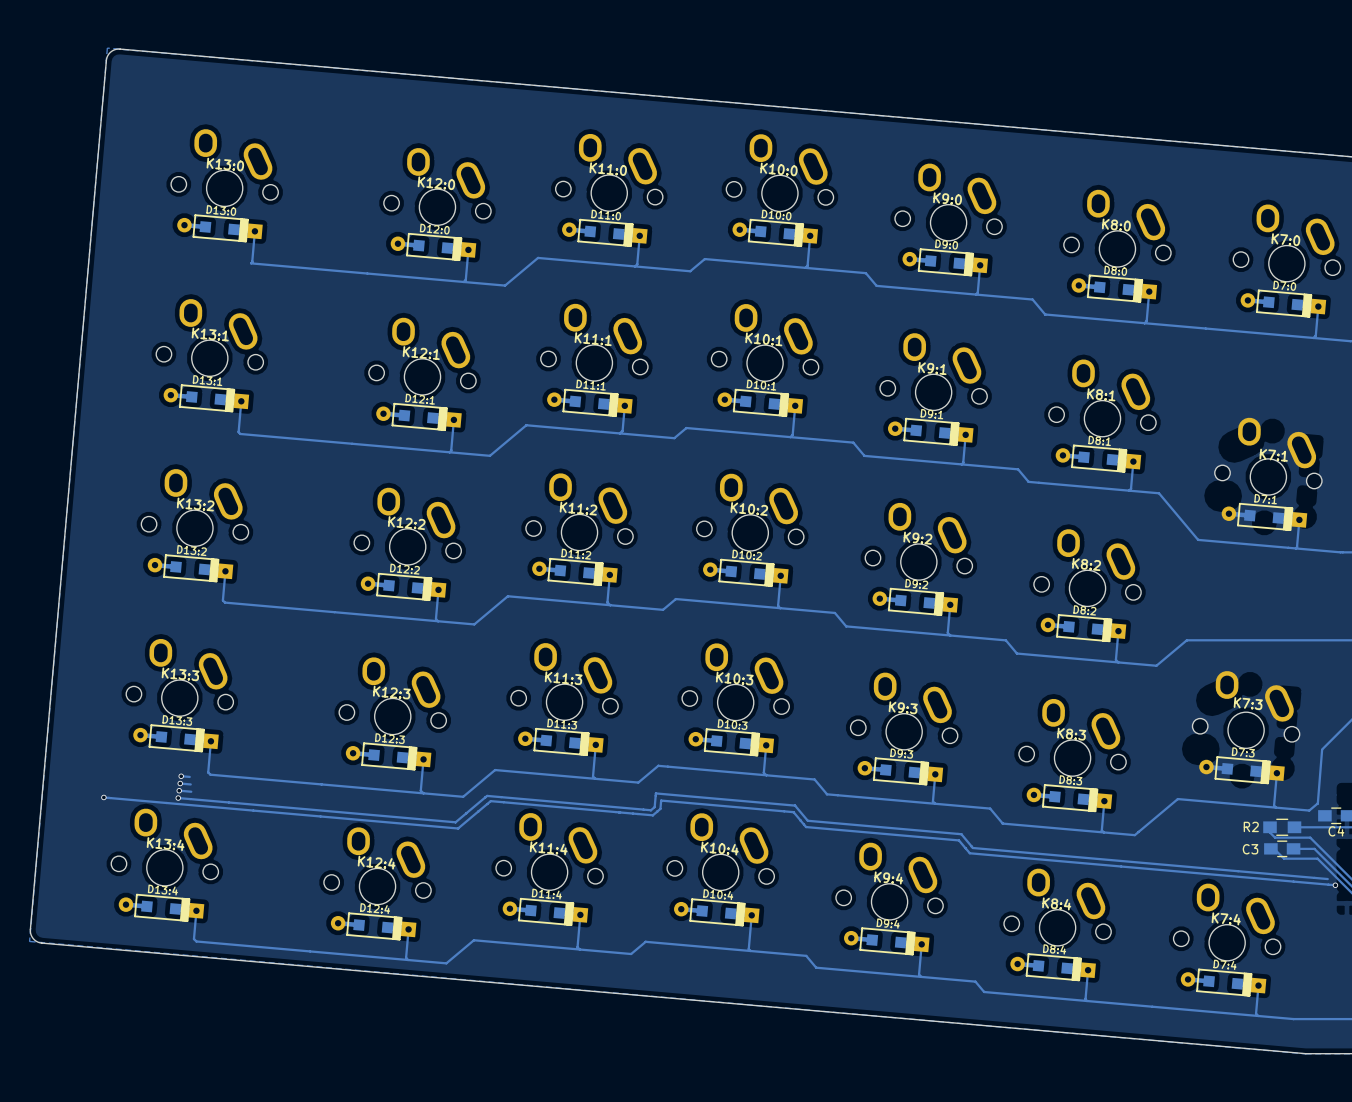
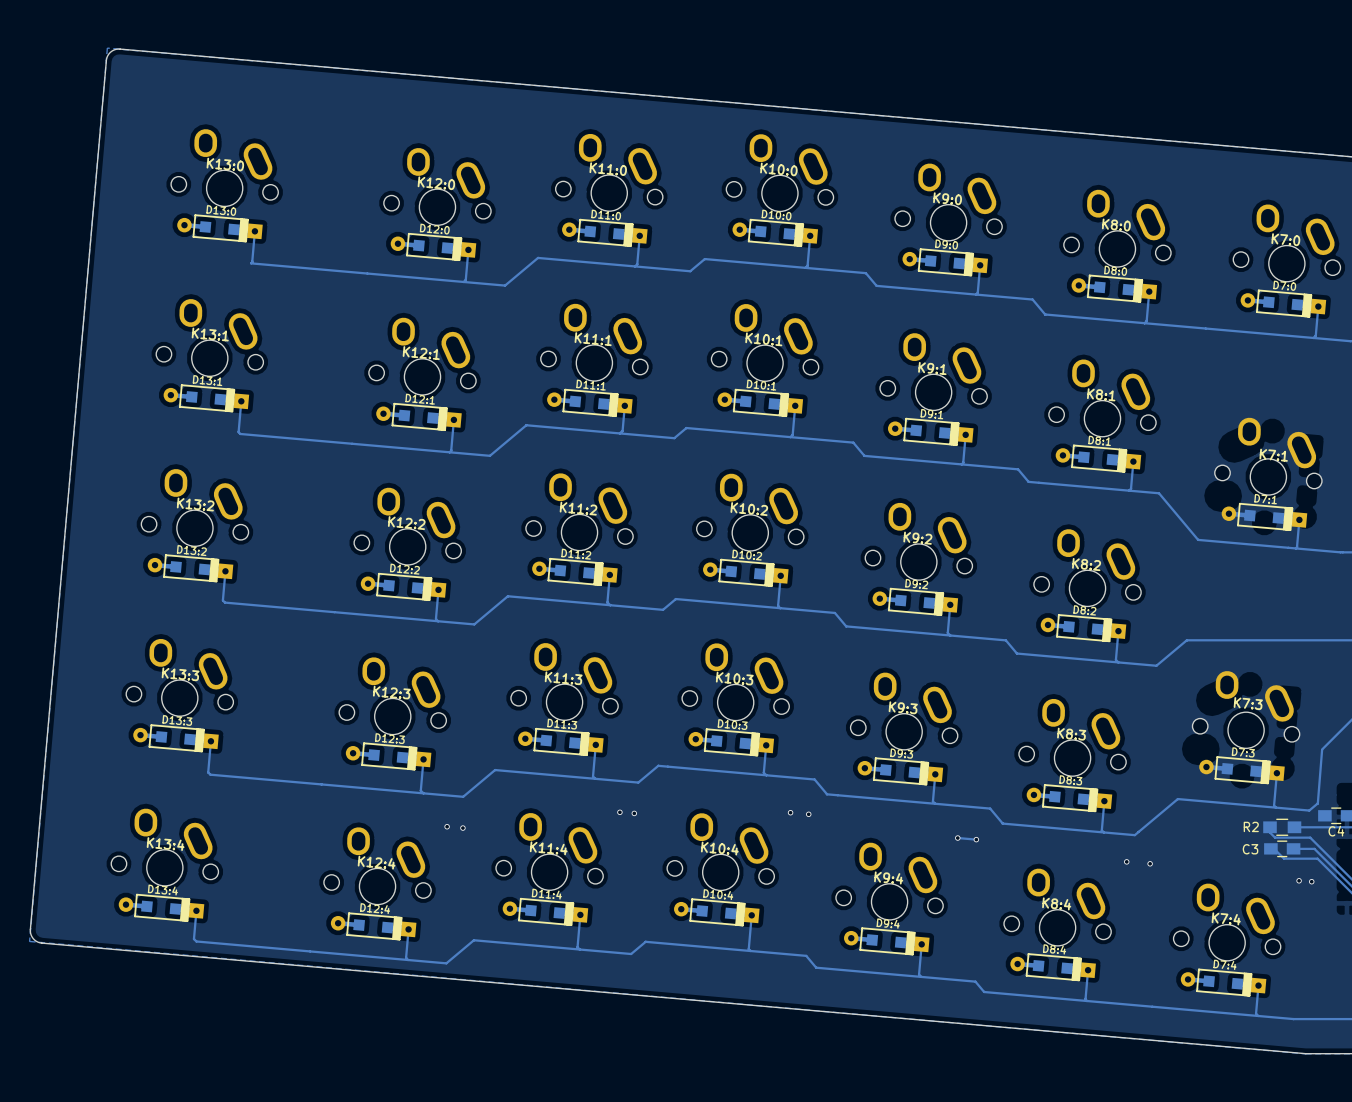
track: (181, 776) (189, 776) -> none
via: (181, 776) -> none
track: (180, 783) (190, 784) -> none
via: (180, 783) -> none
track: (179, 790) (191, 791) -> none
via: (179, 790) -> none
track: (103, 797) (110, 798) -> none
via: (103, 797) -> none
track: (110, 798) (458, 828) (490, 801) (652, 815) -> none
track: (178, 798) (455, 822) -> none
via: (178, 798) -> none
track: (657, 811) (660, 808) (661, 800) (793, 812) -> none
track: (657, 811) (652, 815) -> none
via: none -> (619, 812)
via: none -> (790, 812)
track: (793, 812) (806, 827) (958, 840) -> none
via: none -> (634, 813)
via: none -> (808, 814)
track: (455, 822) (487, 795) (650, 810) (654, 807) (655, 793) (795, 805) (807, 820) (961, 834) (971, 846) -> none
via: none -> (447, 826)
via: none -> (462, 828)
track: none -> (957, 838) (976, 839)
via: none -> (957, 838)
via: none -> (976, 839)
track: (958, 840) (965, 848) -> none
track: (971, 846) (1327, 879) -> none
track: (965, 848) (969, 853) (1335, 885) -> none
via: none -> (1126, 861)
via: none -> (1150, 863)
via: none -> (1299, 880)
via: none -> (1311, 881)
via: (1335, 885) -> none

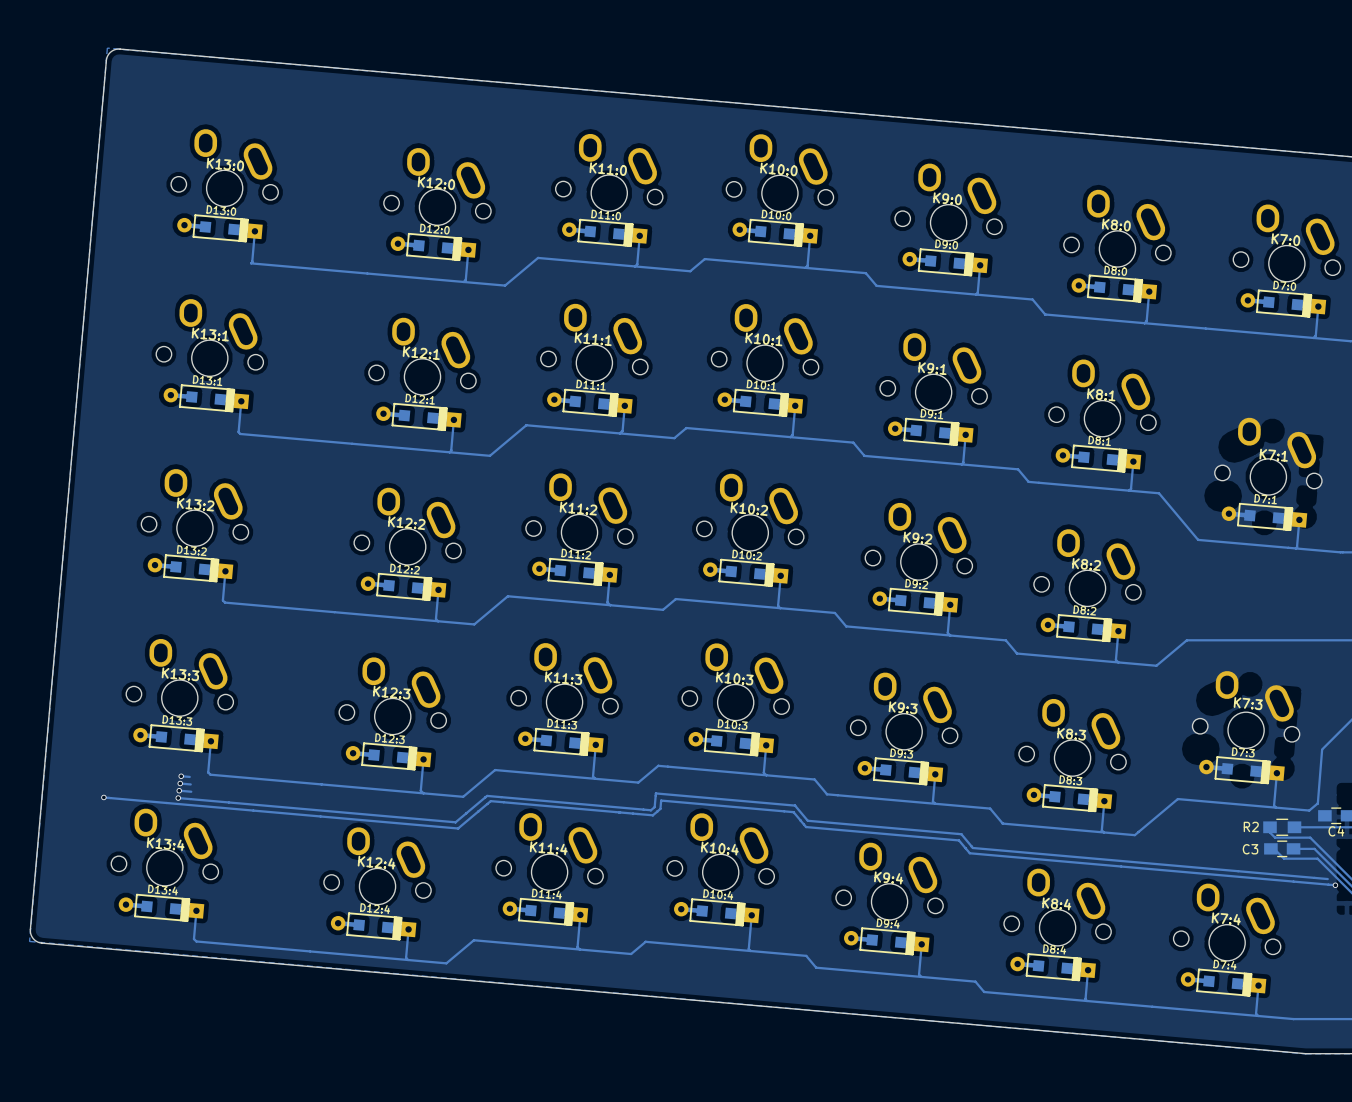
track: none -> (181, 776) (189, 776)
via: none -> (181, 776)
track: none -> (180, 783) (190, 784)
via: none -> (180, 783)
track: none -> (179, 790) (191, 791)
via: none -> (179, 790)
track: none -> (103, 797) (110, 798)
via: none -> (103, 797)
track: none -> (110, 798) (458, 828) (490, 801) (652, 815)
track: none -> (178, 798) (455, 822)
via: none -> (178, 798)
track: none -> (657, 811) (660, 808) (661, 800) (793, 812)
track: none -> (657, 811) (652, 815)
via: (619, 812) -> none
via: (790, 812) -> none
track: none -> (793, 812) (806, 827) (958, 840)
via: (634, 813) -> none
via: (808, 814) -> none
track: none -> (455, 822) (487, 795) (650, 810) (654, 807) (655, 793) (795, 805) (807, 820) (961, 834) (971, 846)
via: (447, 826) -> none
via: (462, 828) -> none
track: (957, 838) (976, 839) -> none
via: (957, 838) -> none
via: (976, 839) -> none
track: none -> (958, 840) (965, 848)
track: none -> (971, 846) (1327, 879)
track: none -> (965, 848) (969, 853) (1335, 885)
via: (1126, 861) -> none
via: (1150, 863) -> none
via: (1299, 880) -> none
via: (1311, 881) -> none
via: none -> (1335, 885)

